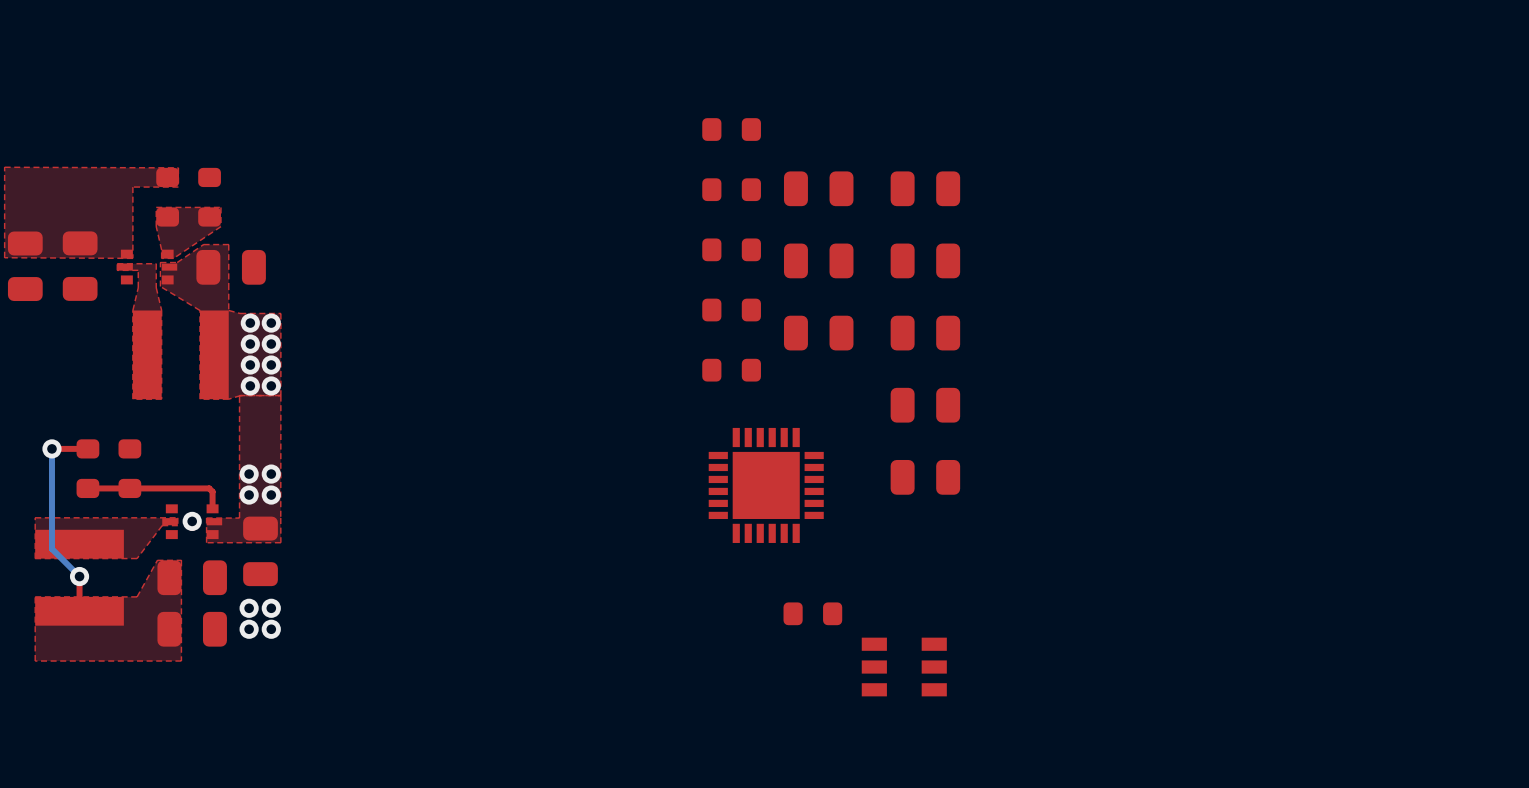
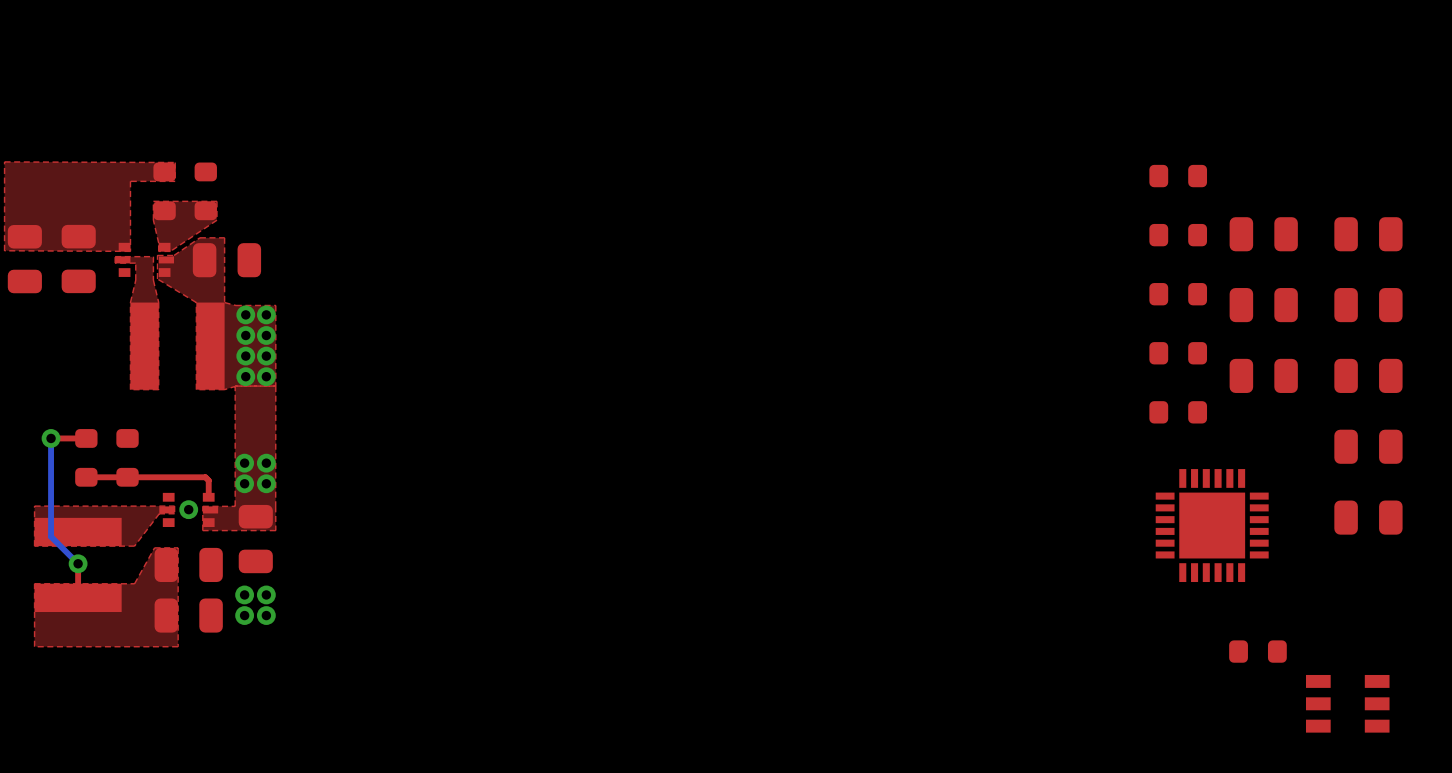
part: (731, 129) -> none
part: none -> (1178, 176)
part: (818, 188) -> none
part: (925, 188) -> none
part: (731, 189) -> none
part: none -> (1263, 234)
part: none -> (1368, 234)
part: none -> (1178, 235)
part: (731, 249) -> none
part: (818, 260) -> none
part: (925, 260) -> none
part: none -> (1178, 294)
part: (731, 310) -> none
part: none -> (1263, 305)
part: none -> (1368, 305)
part: (818, 333) -> none
part: (925, 333) -> none
part: none -> (1178, 353)
part: (731, 370) -> none
part: none -> (1263, 375)
part: none -> (1368, 375)
part: (925, 405) -> none
part: none -> (1178, 412)
part: none -> (1368, 446)
part: (925, 477) -> none
part position: (766, 485) -> (1212, 525)
part: none -> (1368, 517)
part: (812, 613) -> none
part: none -> (1257, 651)
part position: (904, 667) -> (1347, 703)

